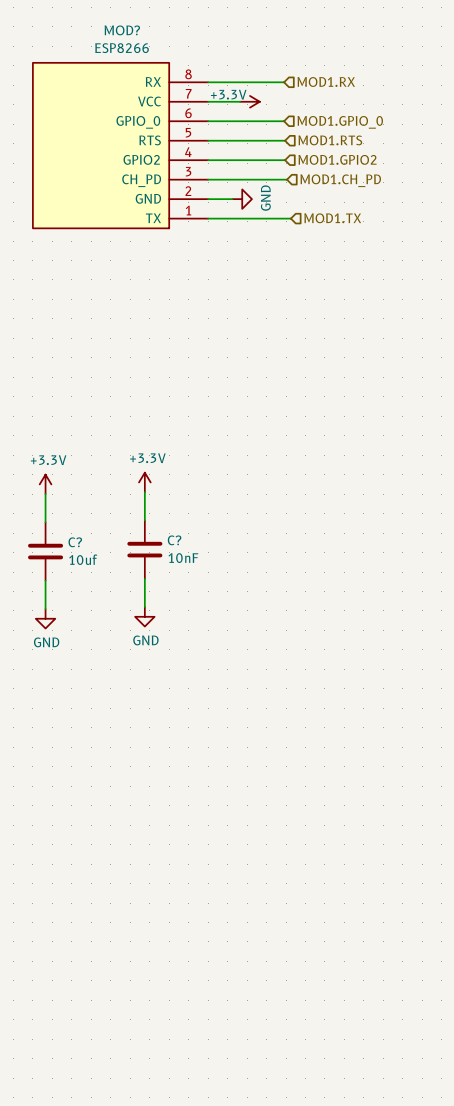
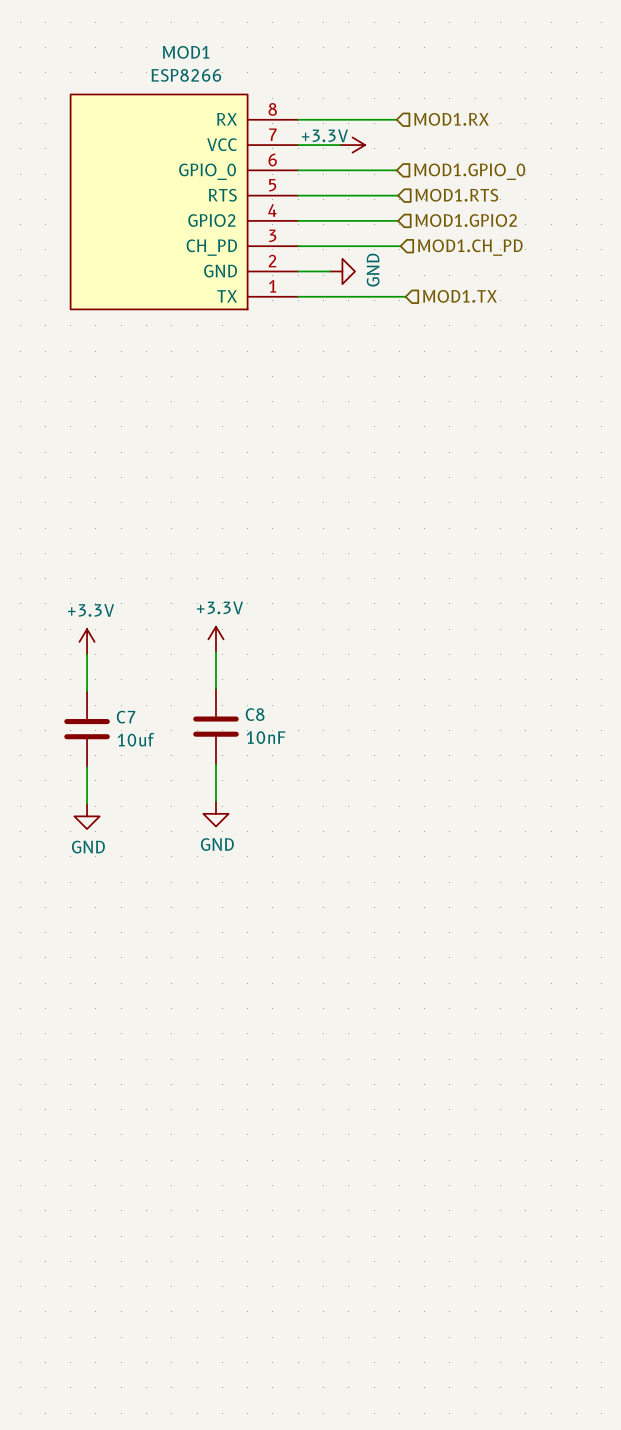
MOD? name: MOD? (122, 30) -> MOD1 (186, 52)
C? name: C? (174, 540) -> C8 (255, 714)
C? name: C? (75, 542) -> C7 (126, 717)

